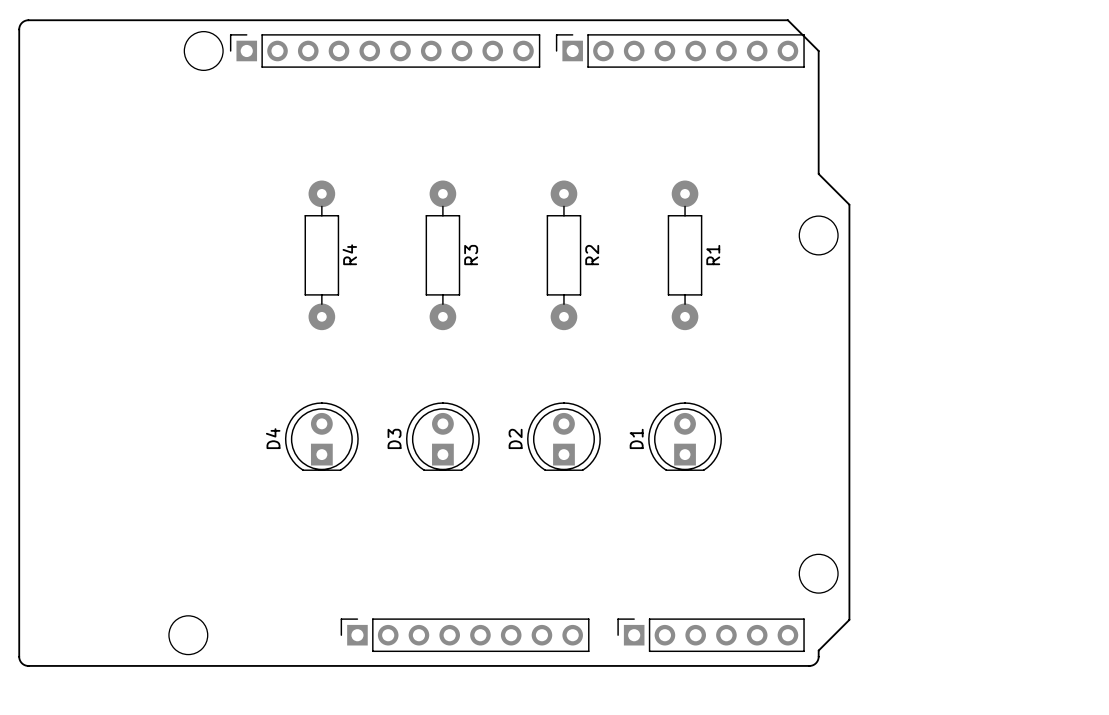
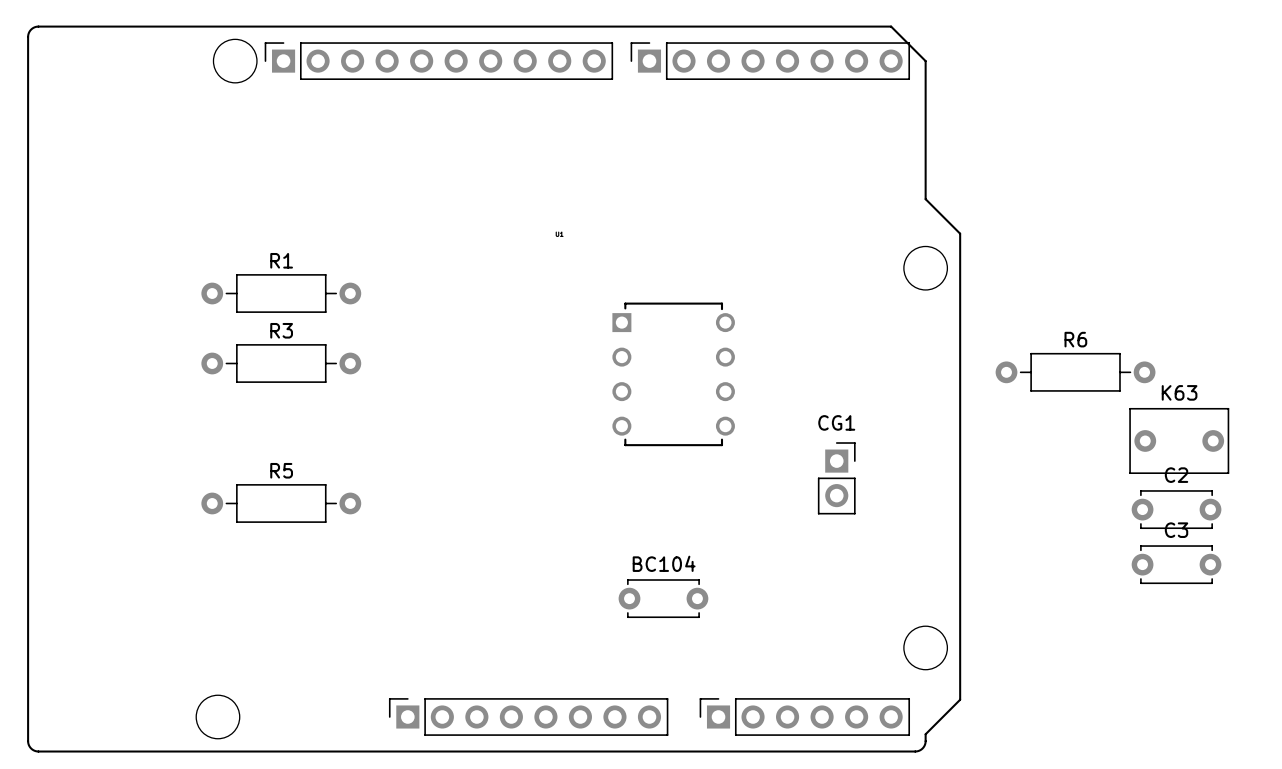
R3 footprint: [425, 180, 461, 331] -> [201, 344, 362, 383]
R1 footprint: [667, 180, 703, 331] -> [201, 274, 362, 313]
R4: (321, 255) -> none
R3 name position: R3 (471, 255) -> R3 (281, 330)
R2: (563, 255) -> none
R1 name position: R1 (713, 255) -> R1 (281, 260)
R6: none -> (1075, 372)
part: none -> (673, 374)
K63: none -> (1179, 440)
CG1: none -> (836, 478)
D4: (321, 436) -> none
D3: (442, 436) -> none
D2: (563, 436) -> none
D1: (685, 436) -> none
R5: none -> (281, 503)
C2: none -> (1176, 509)
C3: none -> (1176, 564)
BC104: none -> (663, 598)

